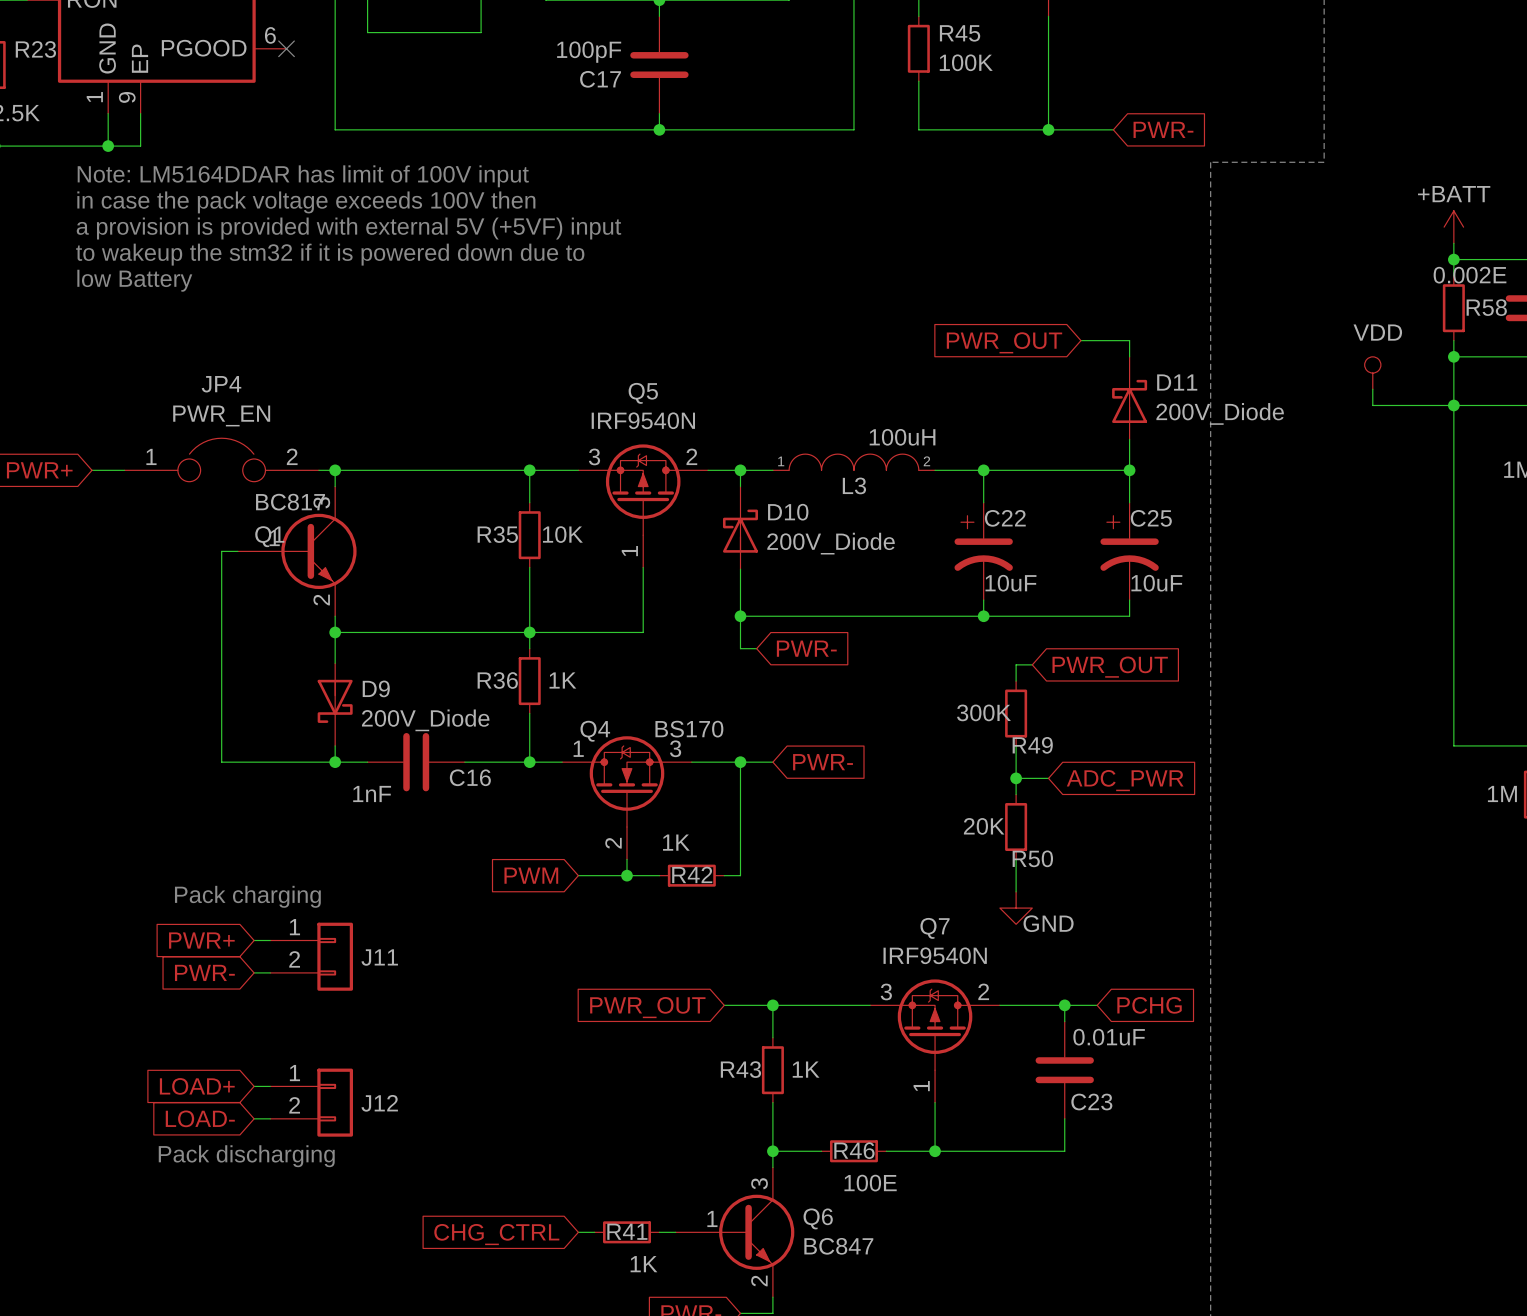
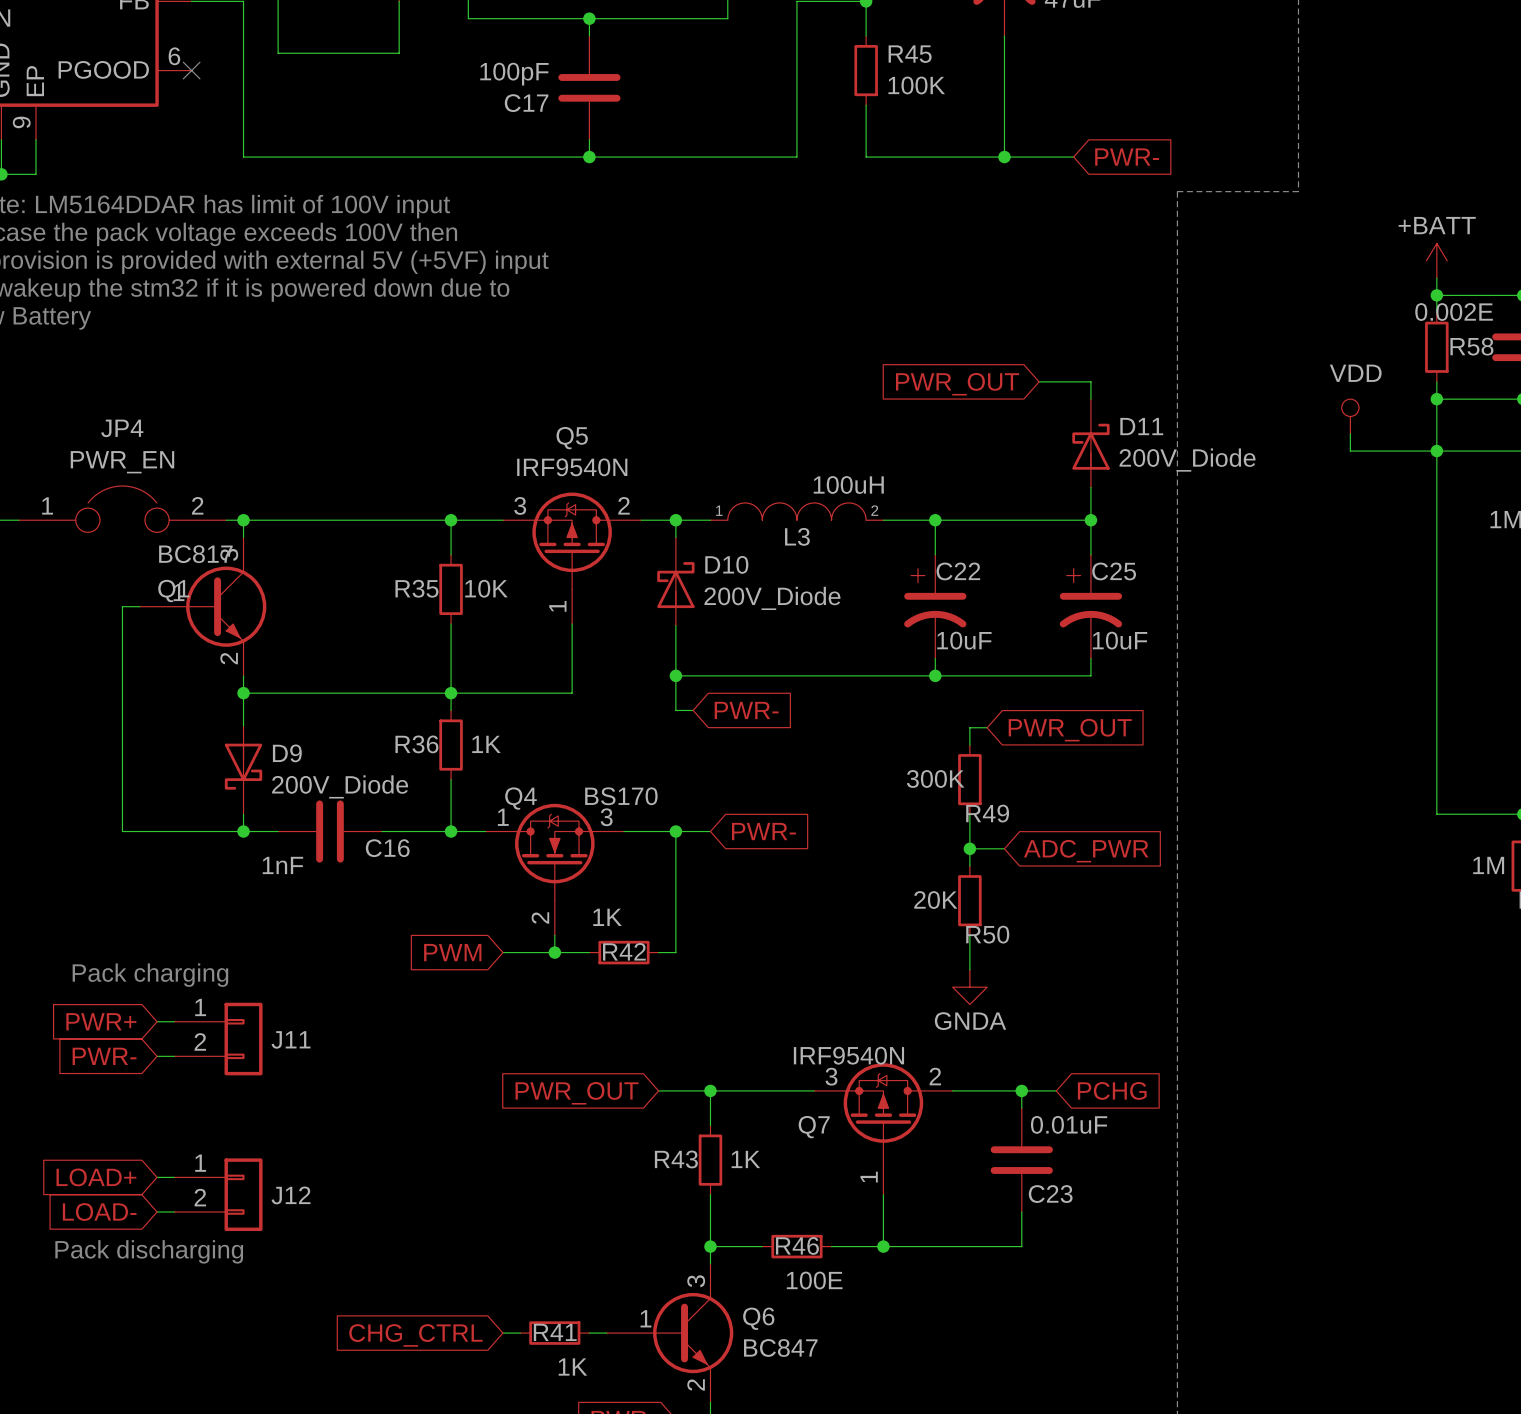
power symbol: GND (1016, 908) -> GNDA (969, 987)
Q7 name position: Q7 (935, 928) -> Q7 (814, 1127)
Q7 value position: IRF9540N (935, 955) -> IRF9540N (848, 1055)

